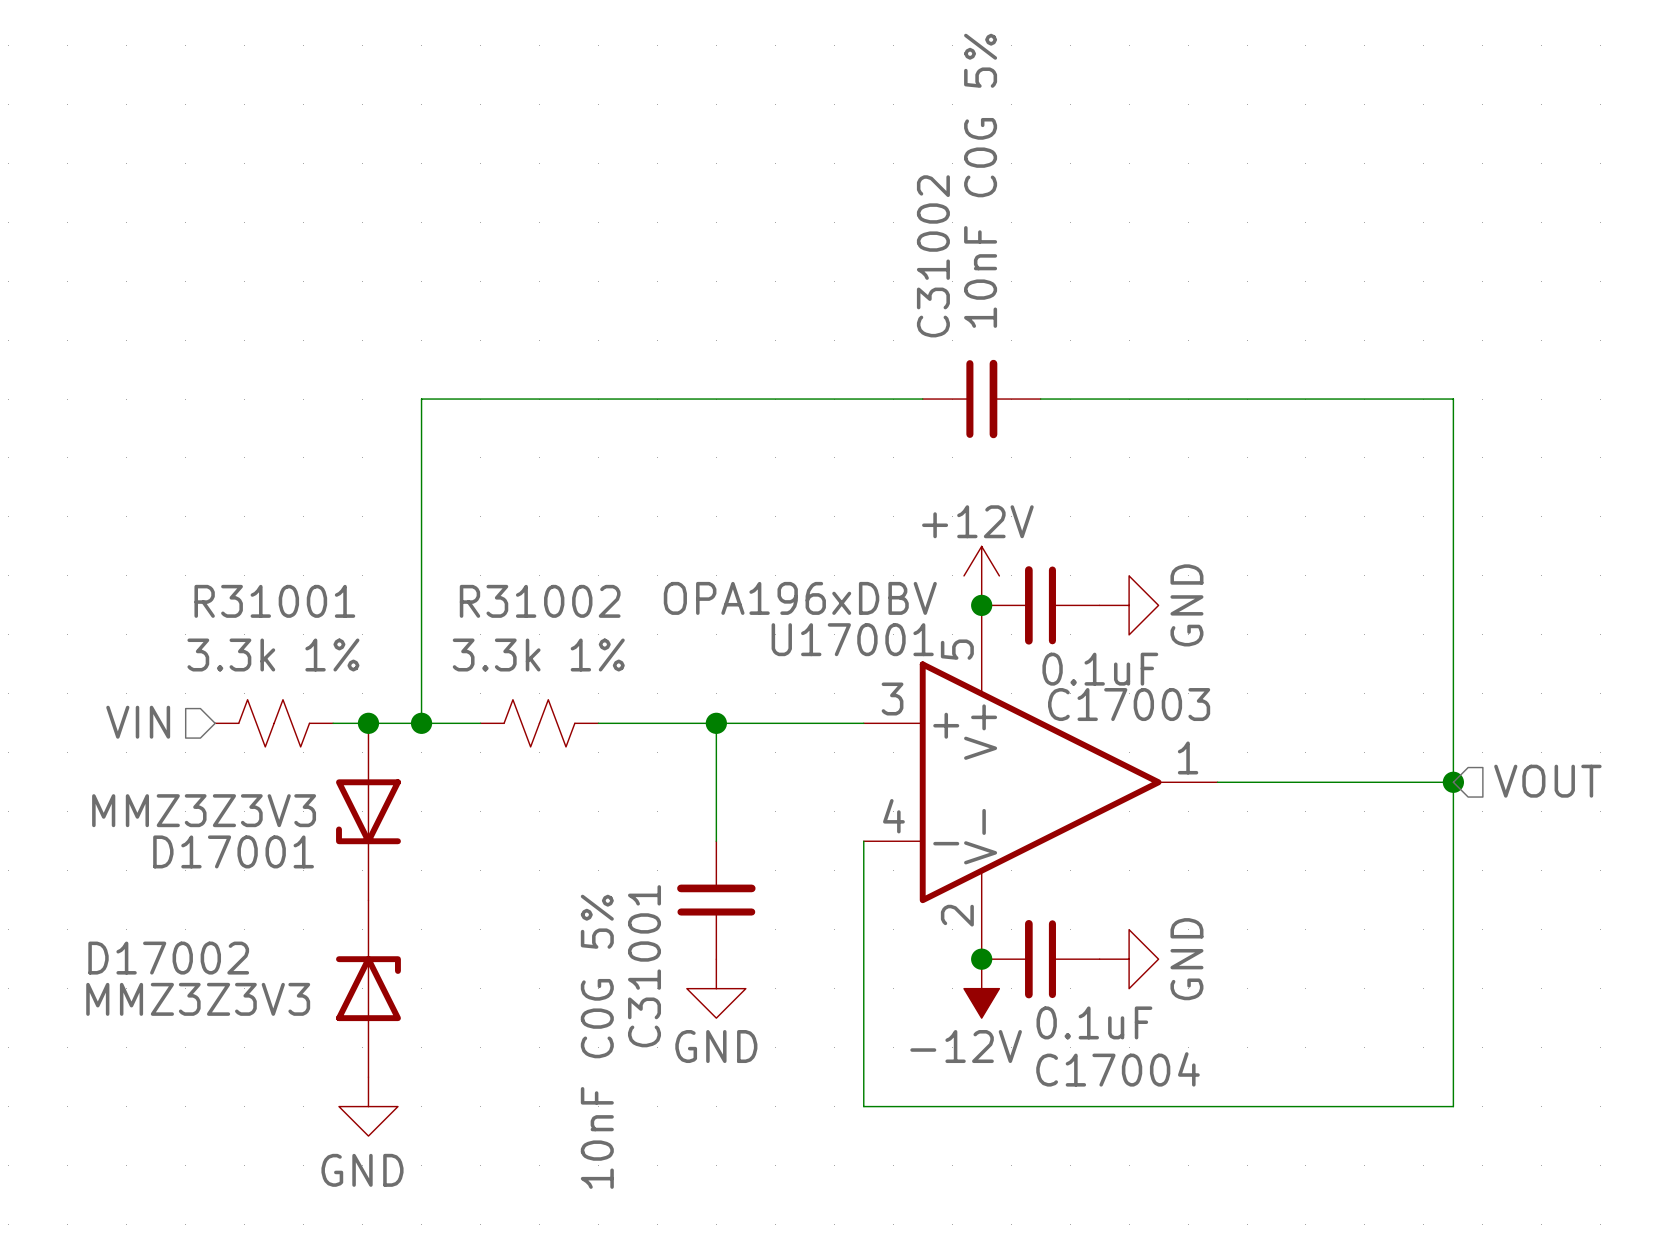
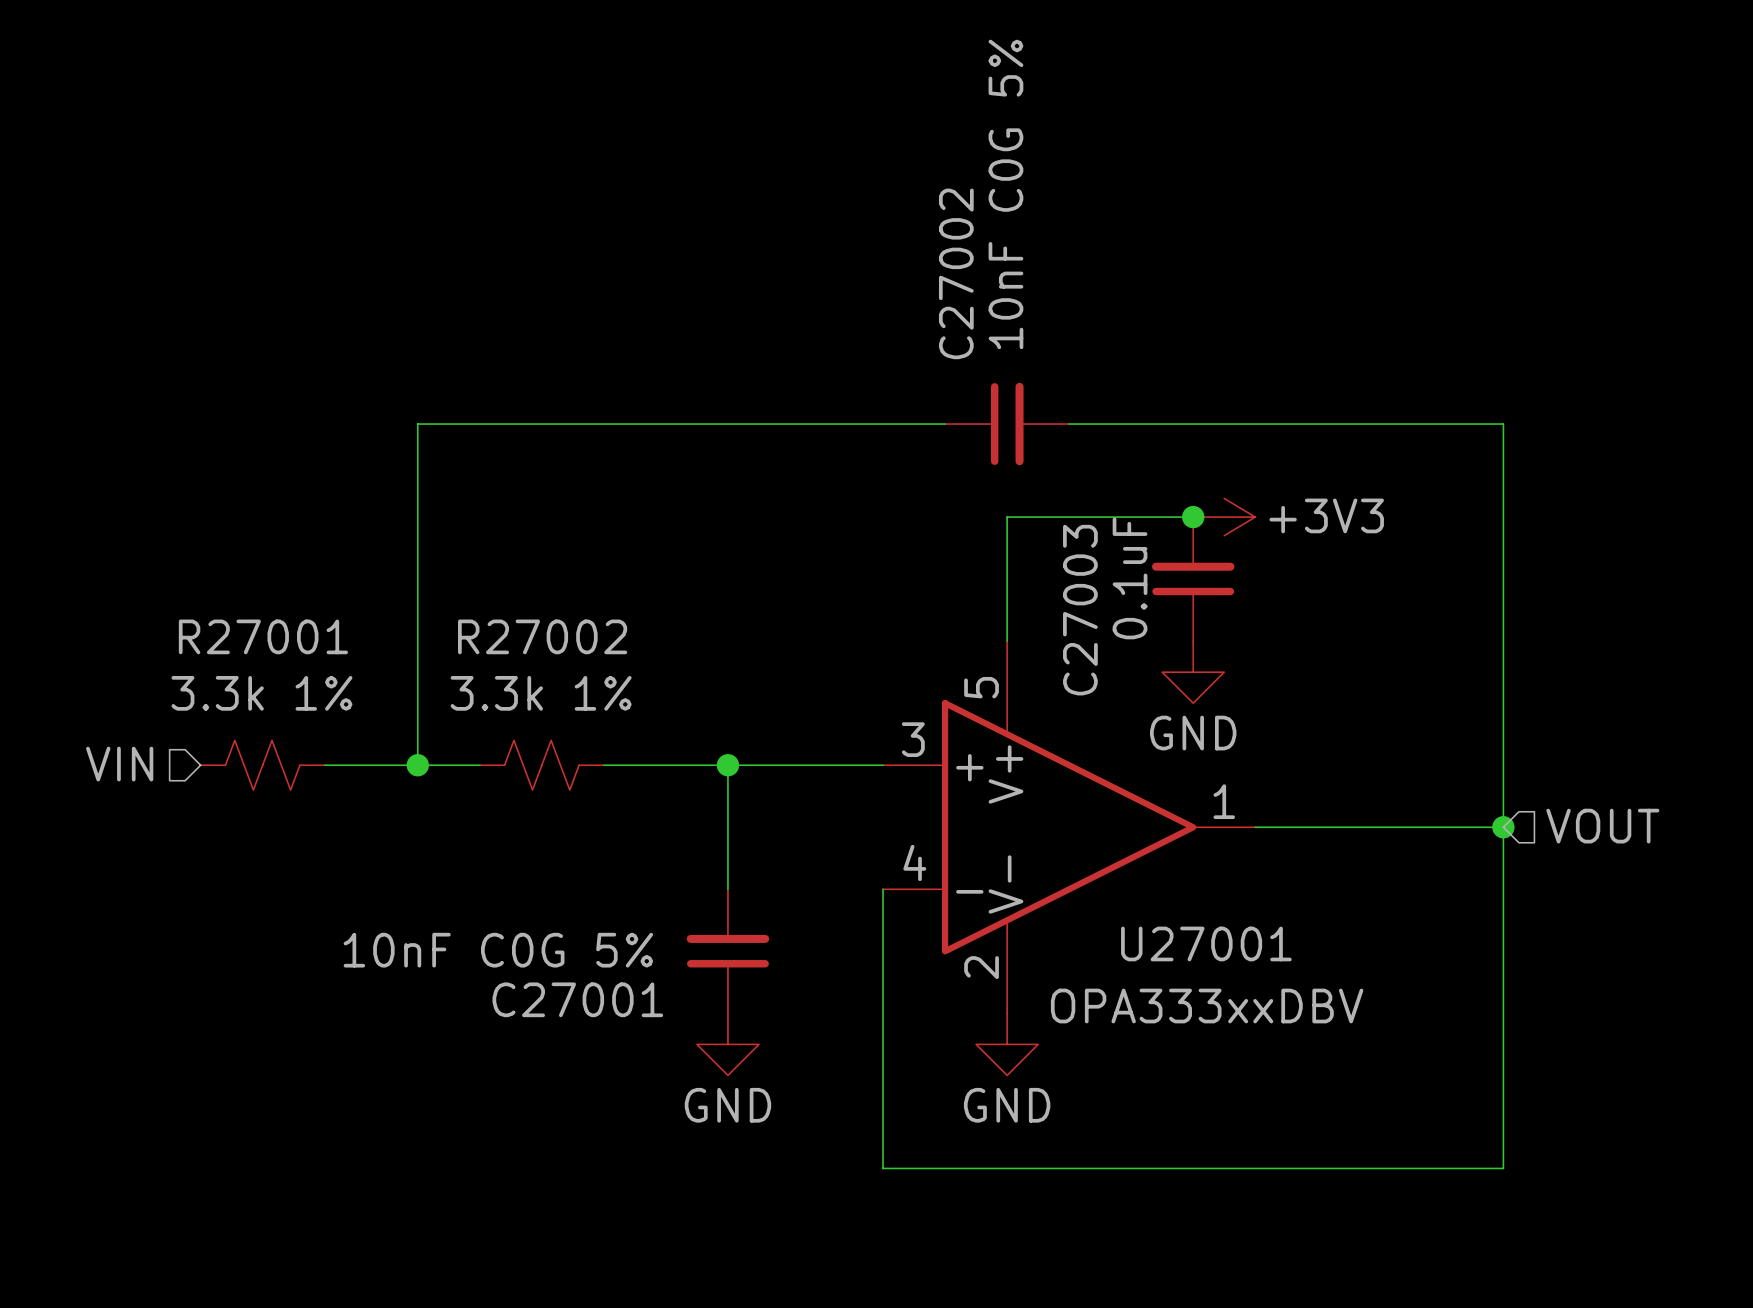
C31002 name: C31002 (933, 256) -> C27002 (956, 273)
wire: none -> (1193, 517) (1007, 517) (1007, 641)
junction: none -> (1193, 517)
power symbol: none -> +3V3 (1224, 517)
C27003: none -> 0.1uF (1193, 579)
power symbol: +12V (981, 575) -> none
U17001 value: OPA196xDBV (800, 598) -> OPA333xxDBV (1207, 1006)
R31001 name: R31001 (274, 601) -> R27001 (263, 636)
R31002 name: R31002 (540, 601) -> R27002 (542, 636)
junction: (981, 605) -> none
C17003: 0.1uF (1040, 605) -> none
power symbol rotation: 0° (1129, 605) -> 90° clockwise (1193, 672)
power symbol position: GND (1129, 605) -> GND (1193, 672)
U17001 name: U17001 (852, 639) -> U27001 (1206, 943)
junction: (368, 723) -> none
D17001: MMZ3Z3V3 (368, 811) -> none
junction: (981, 959) -> none
C17004: 0.1uF (1040, 959) -> none
power symbol: GND (1129, 959) -> none
C31001 name: C31001 (644, 966) -> C27001 (577, 999)
D17002: MMZ3Z3V3 (368, 988) -> none
power symbol: -12V (981, 988) -> GND (1007, 1044)
C31001 value rotation: 0° (597, 1041) -> 90° clockwise (498, 950)
power symbol: GND (368, 1106) -> none

